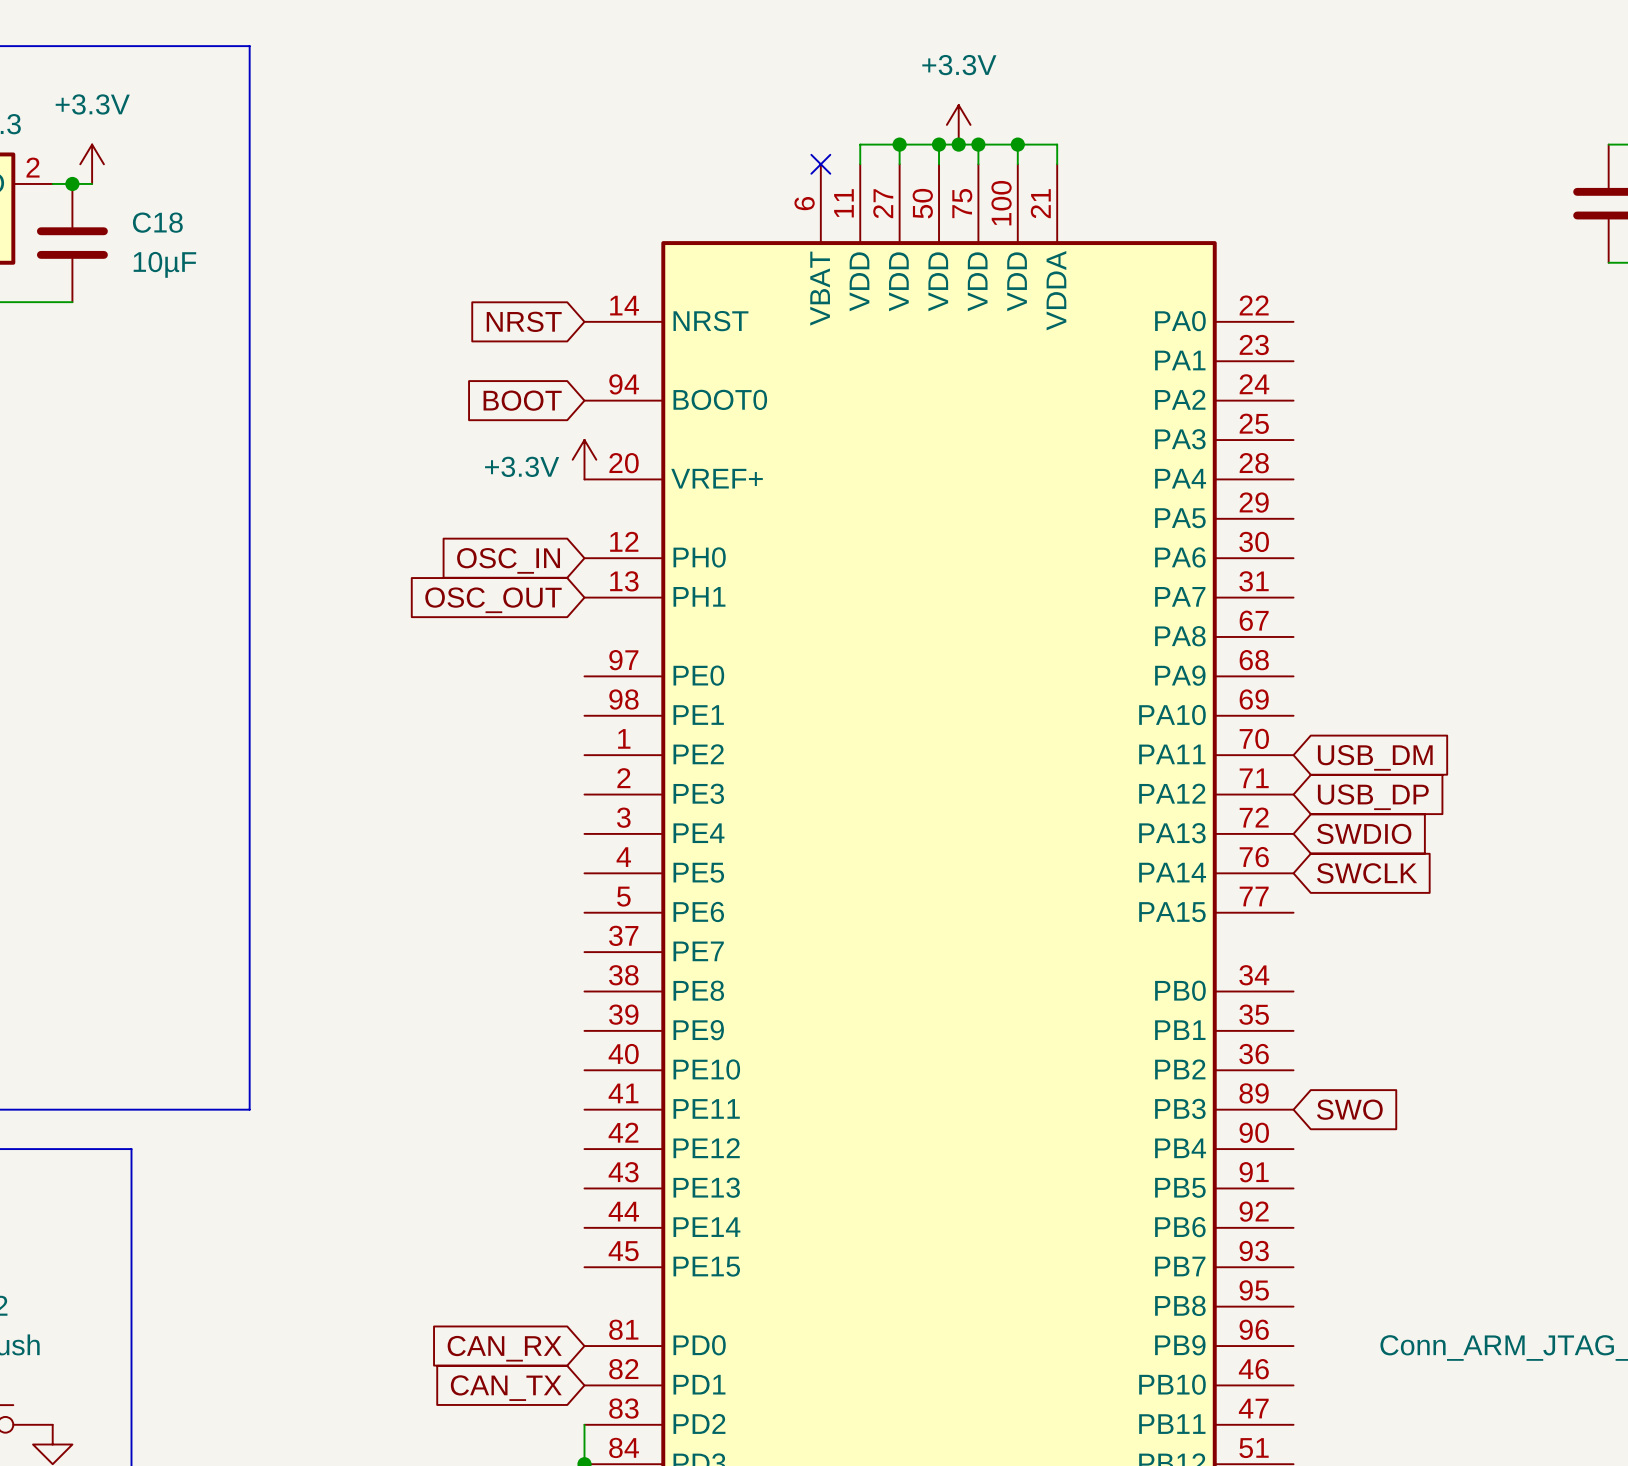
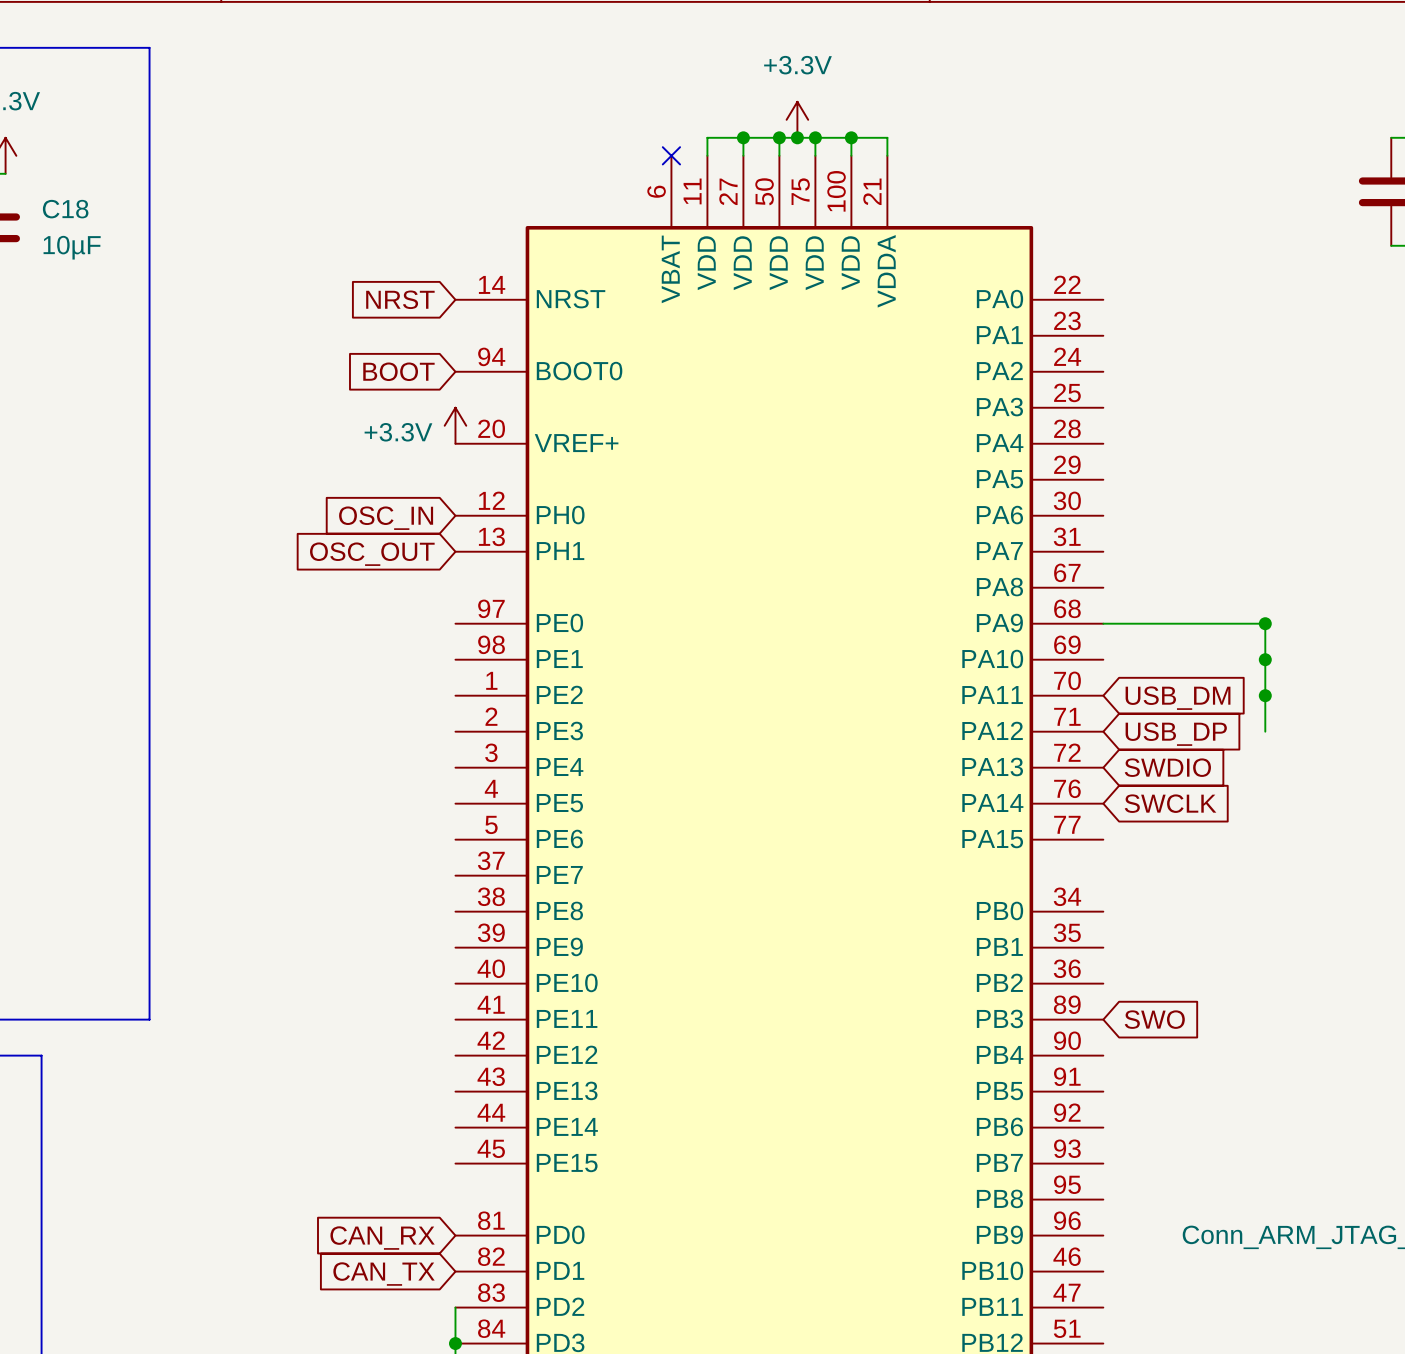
wire: none -> (1103, 623) (1265, 623) (1265, 731)
junction: none -> (1265, 623)
junction: none -> (1265, 659)
junction: none -> (1265, 695)

